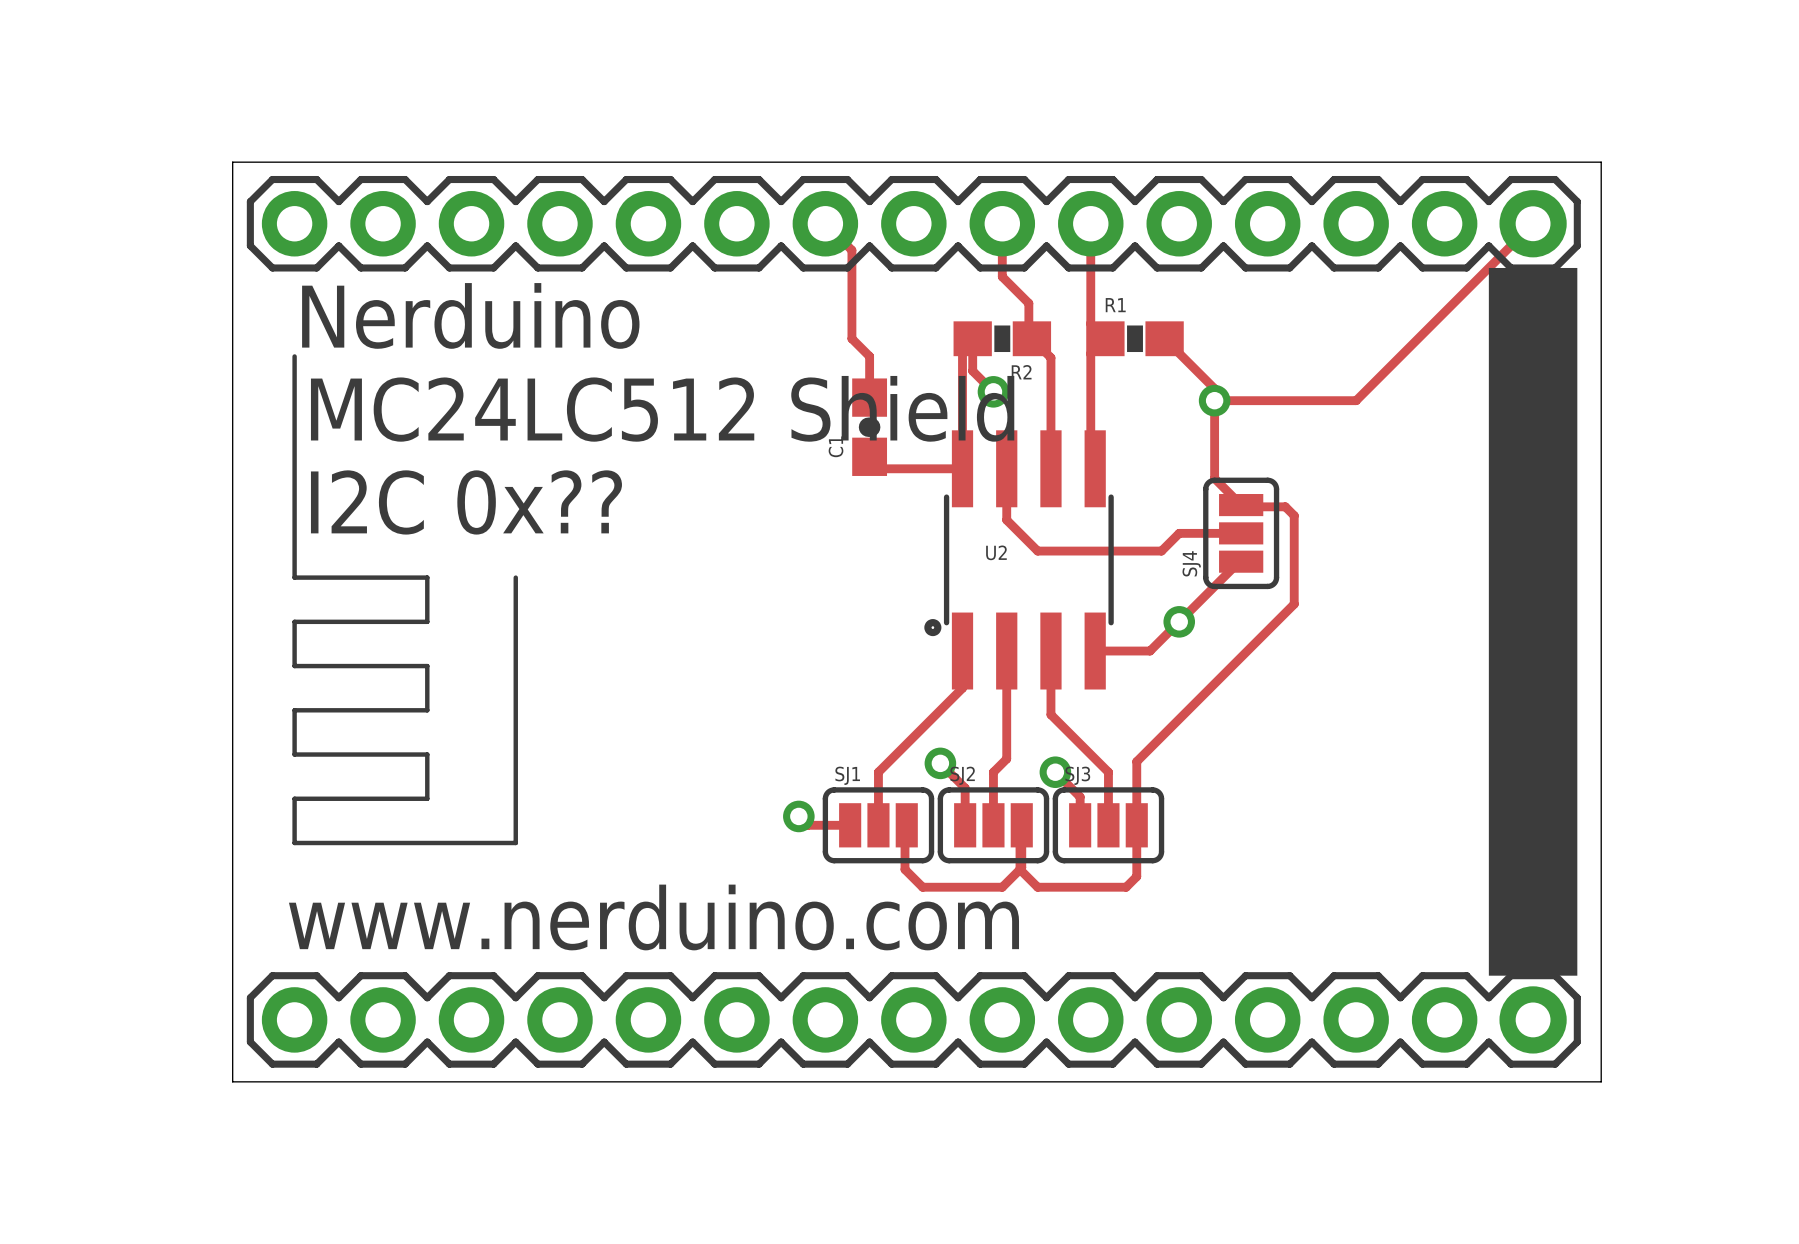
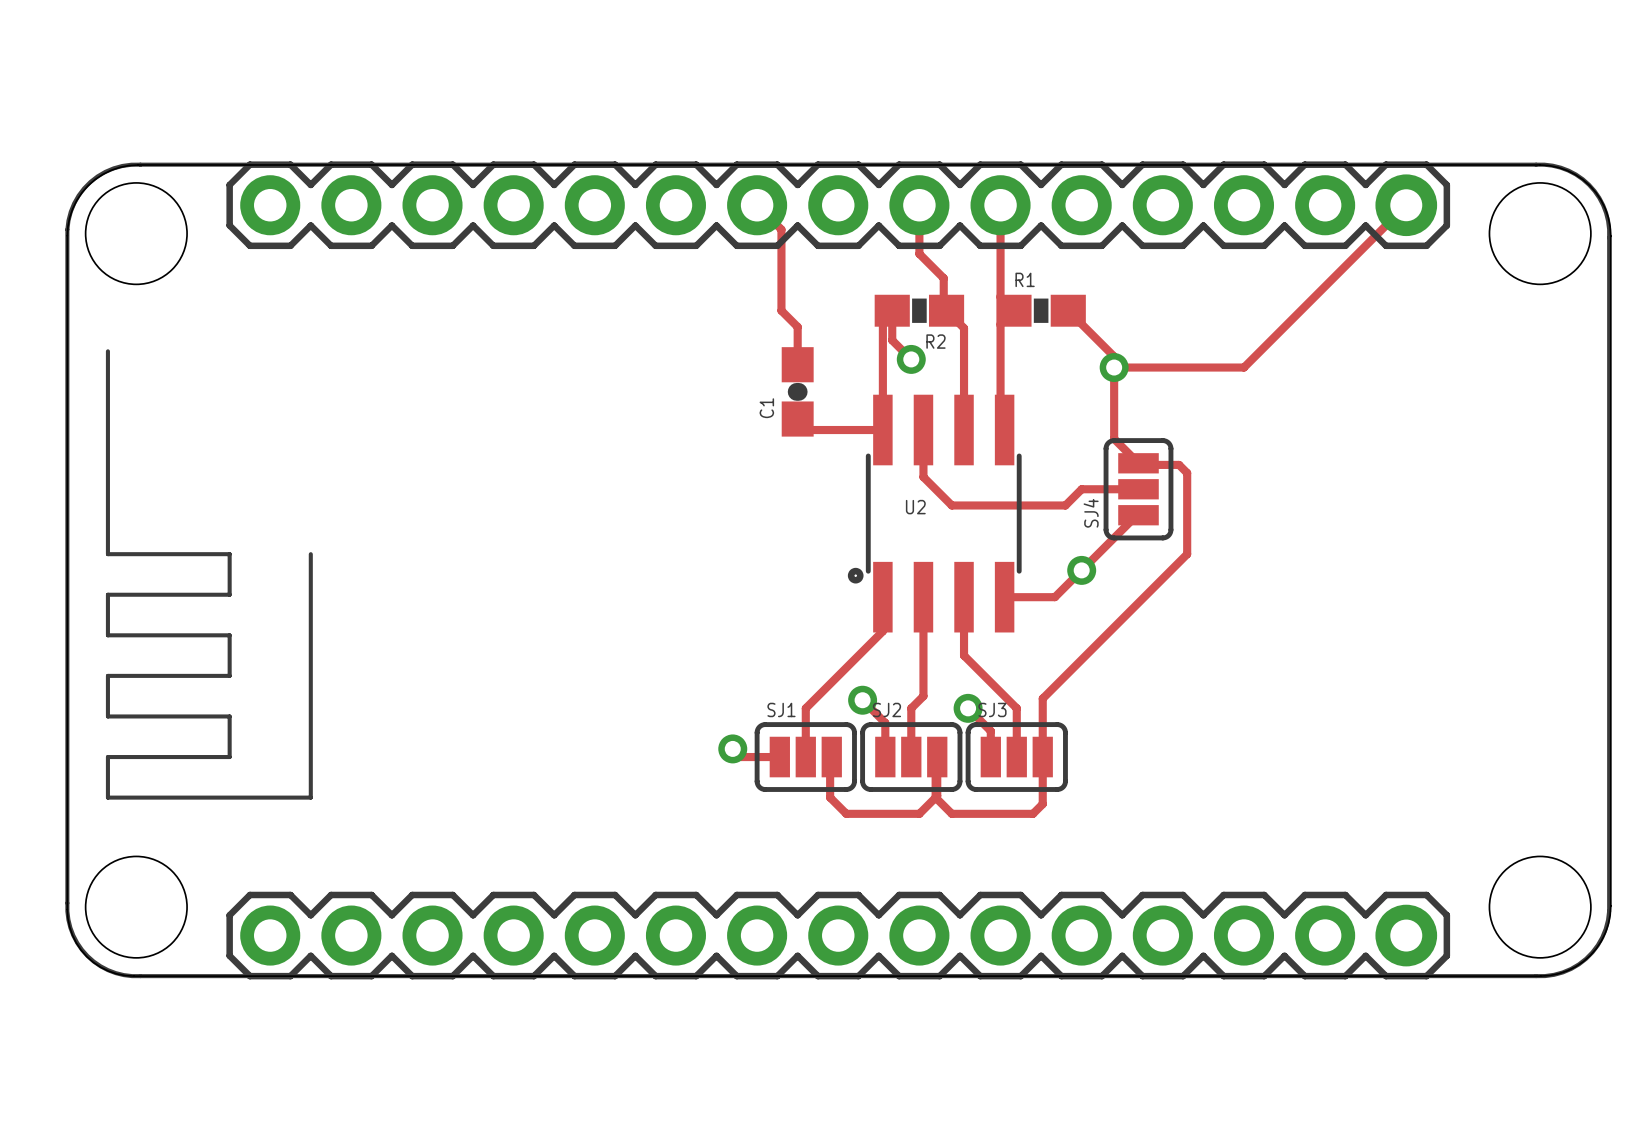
board edge: (232, 162) (1601, 162) (1601, 1081) (232, 1081) (232, 162) -> (138, 164) (111, 170) (88, 185) (72, 208) (67, 235) (67, 909) (69, 926) (76, 942) (86, 956) (100, 967) (116, 973) (133, 976) (1540, 976) (1558, 973) (1575, 966) (1590, 955) (1601, 941) (1608, 924) (1610, 905) (1610, 236) (1608, 217) (1601, 200) (1589, 185) (1575, 174) (1558, 167) (1539, 164) (138, 164)
part footprint: [246, 175, 1581, 1068] -> [65, 161, 1612, 980]
text: Nerduino (470, 315) -> none
text: MC24LC512 Shield (662, 408) -> none
text: I2C 0x?? (466, 502) -> none
text: www.nerduino.com (653, 917) -> none

